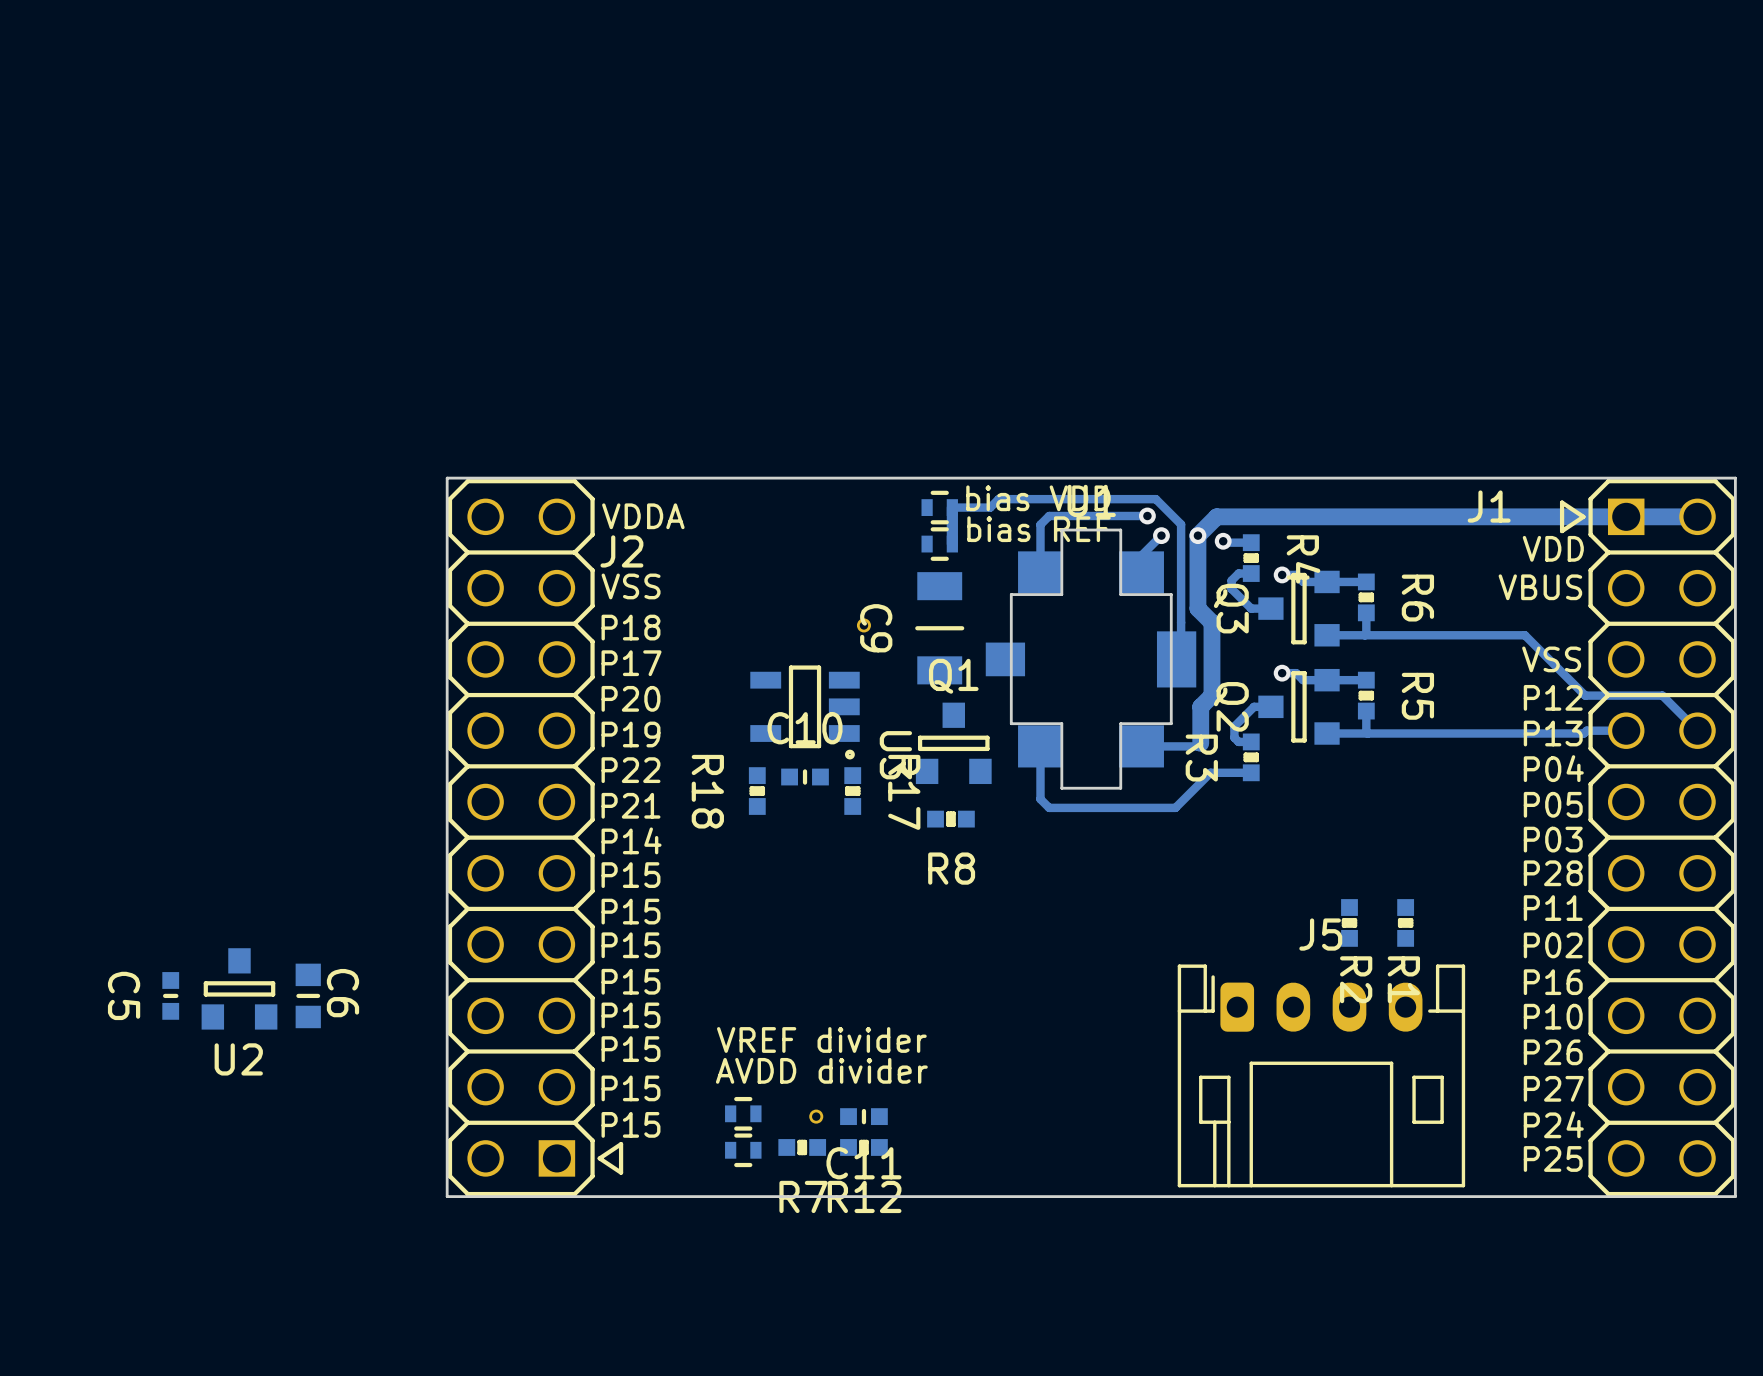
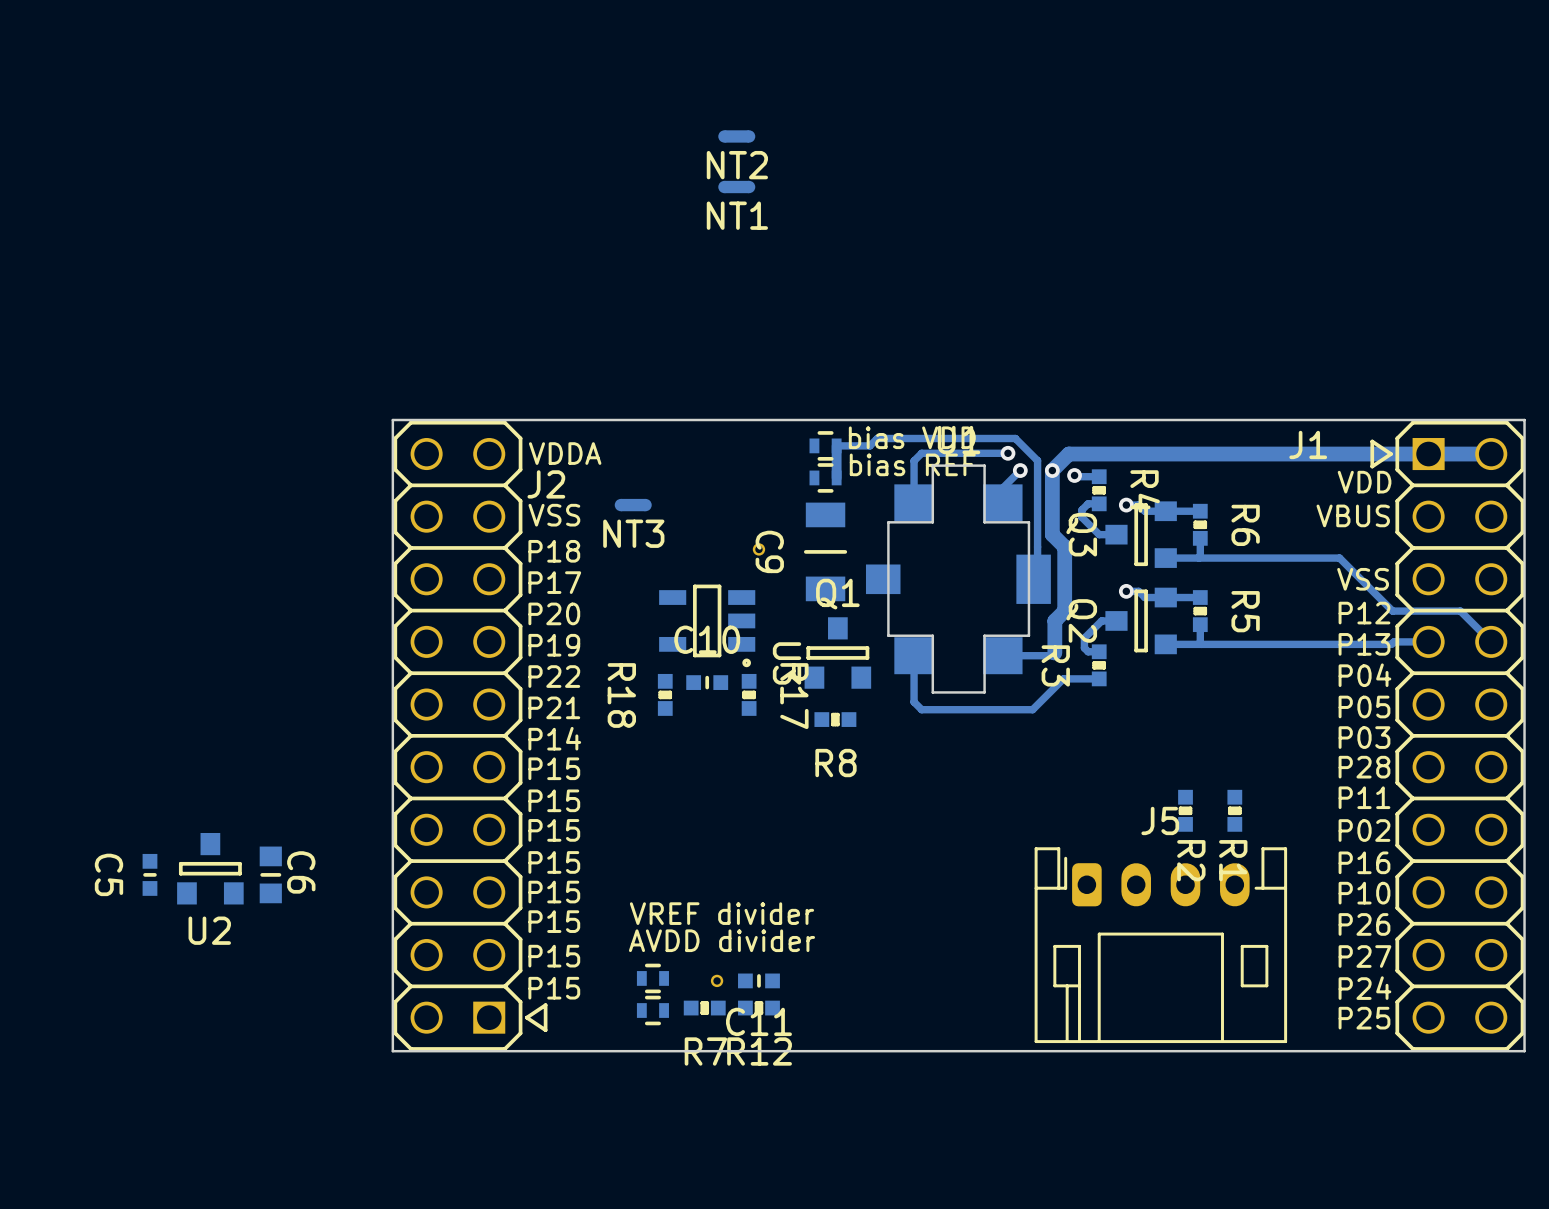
NT2: none -> (736, 136)
NT1: none -> (736, 187)
NT3: none -> (633, 505)

